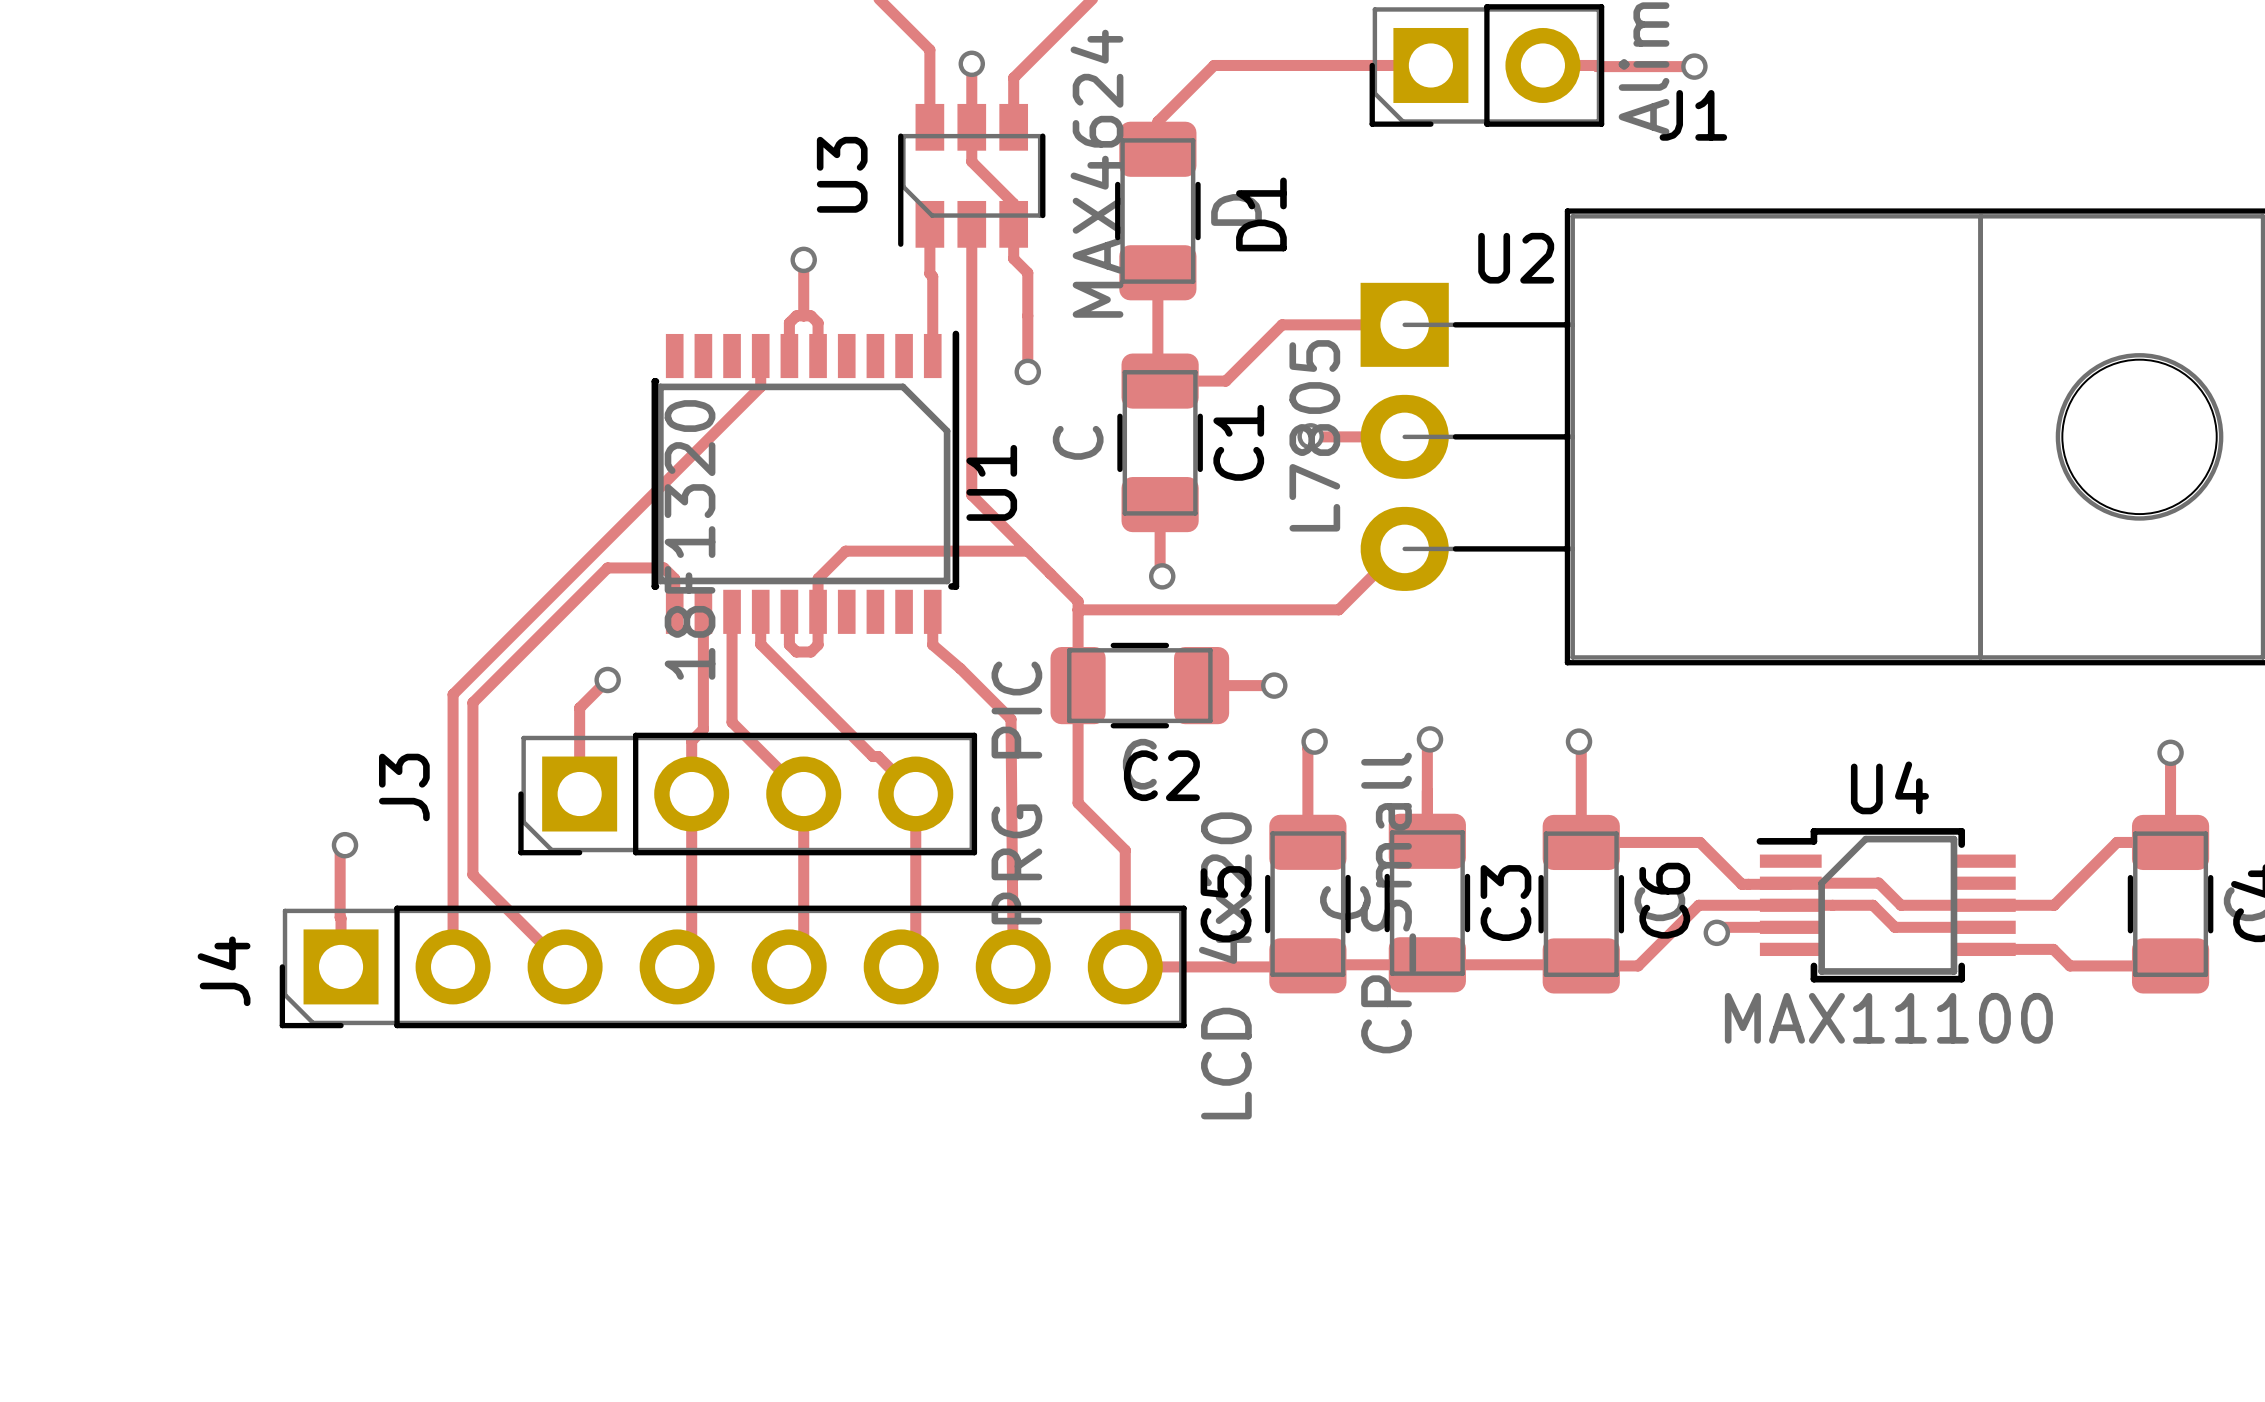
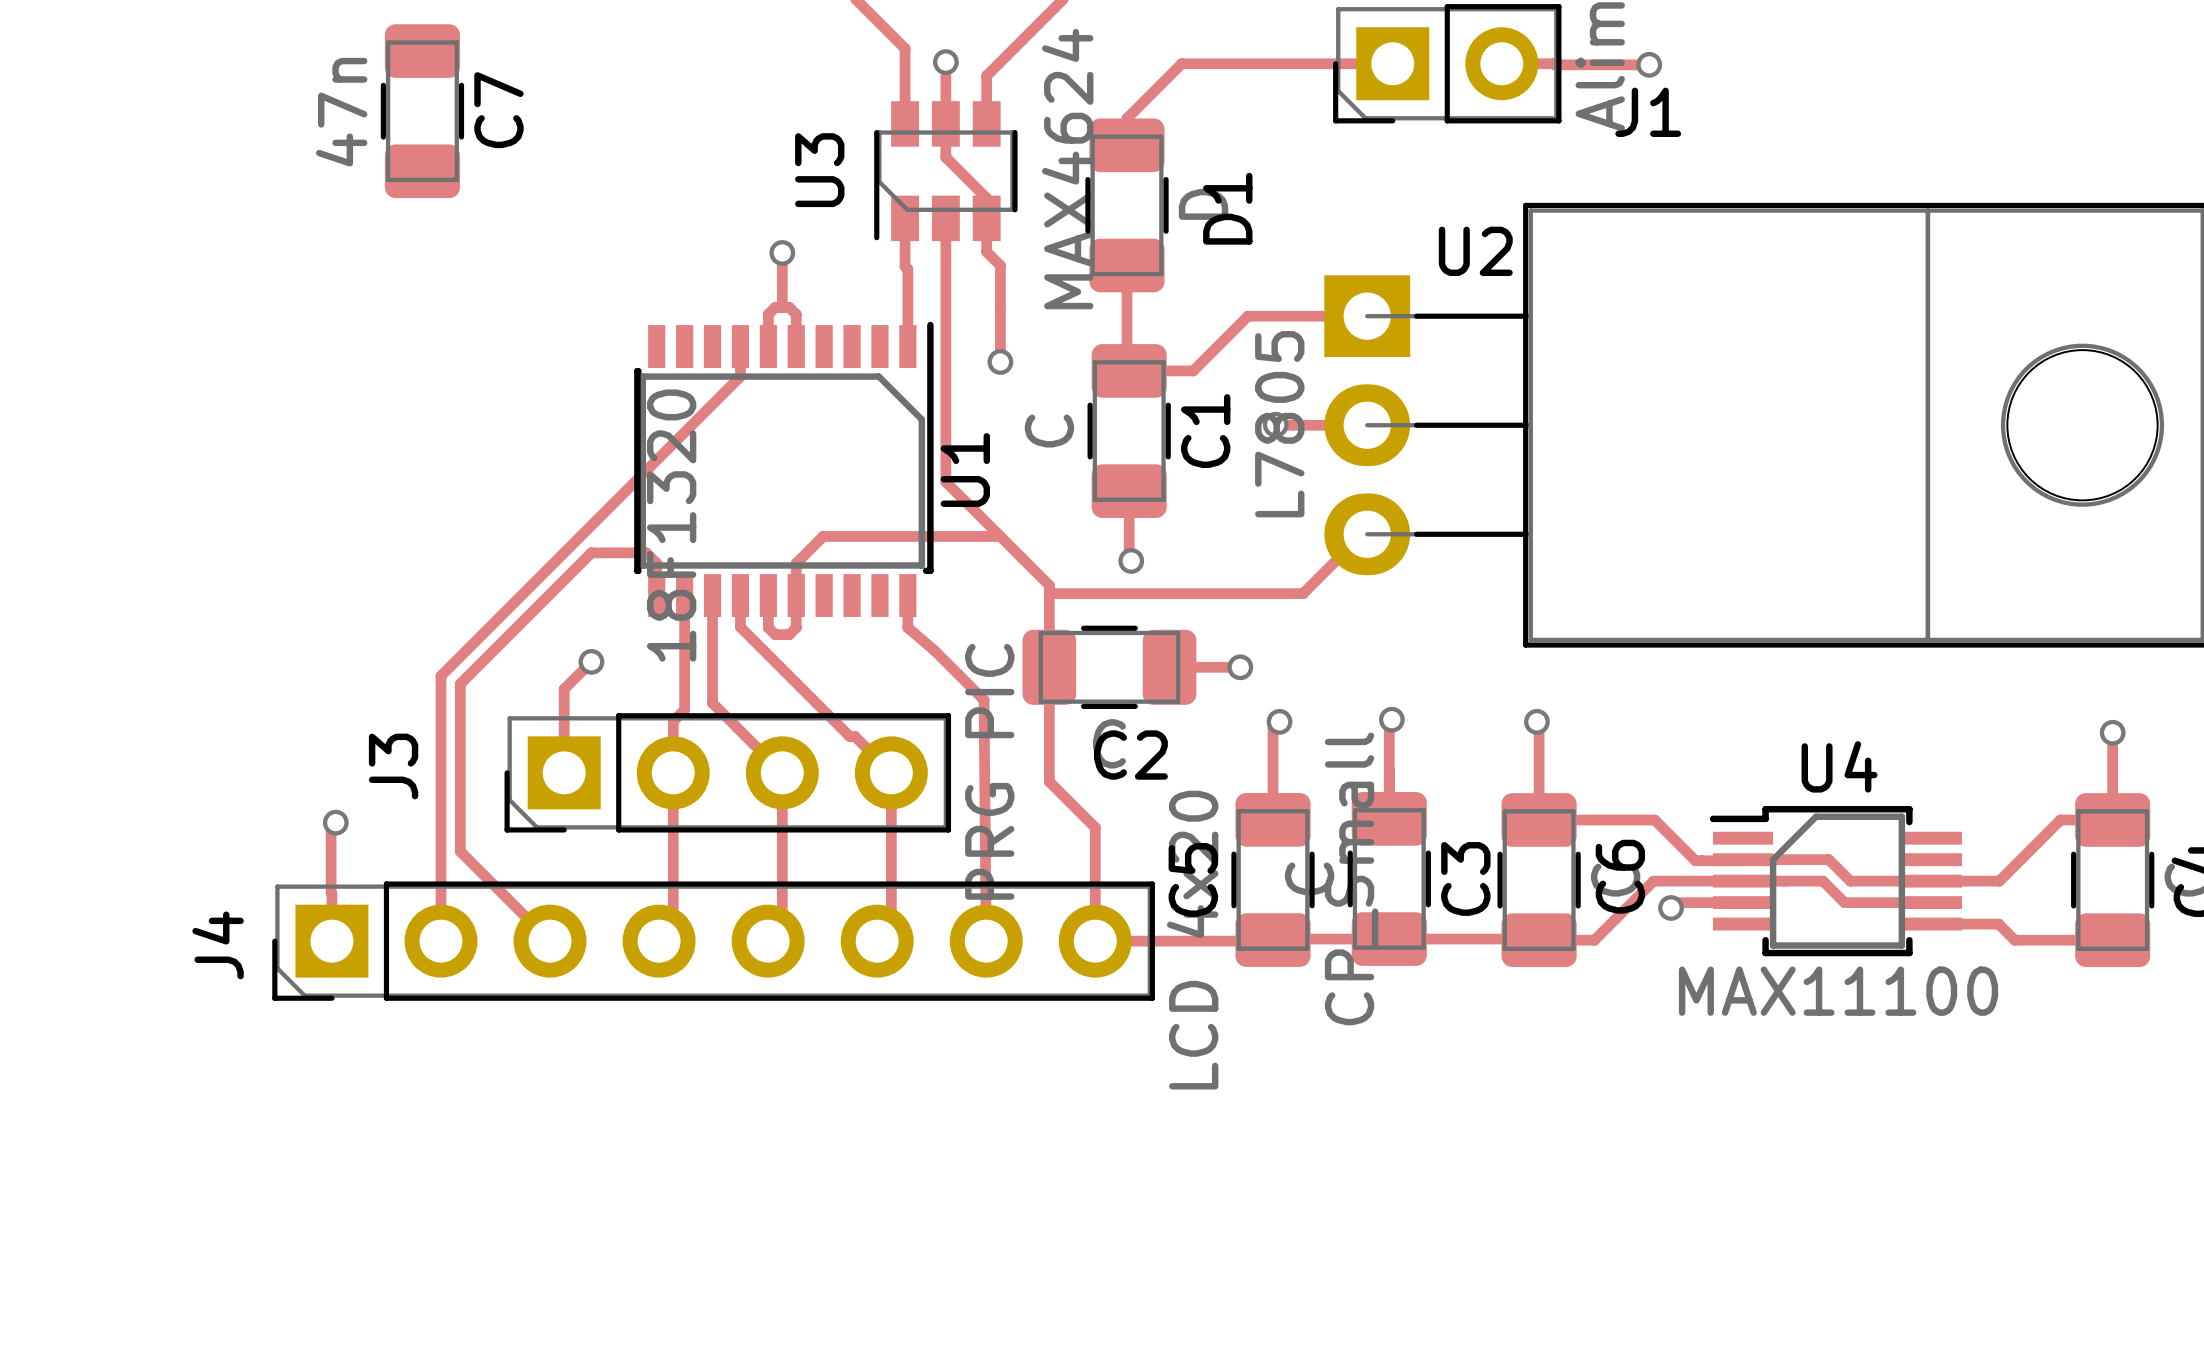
C7: none -> 47n (422, 111)

